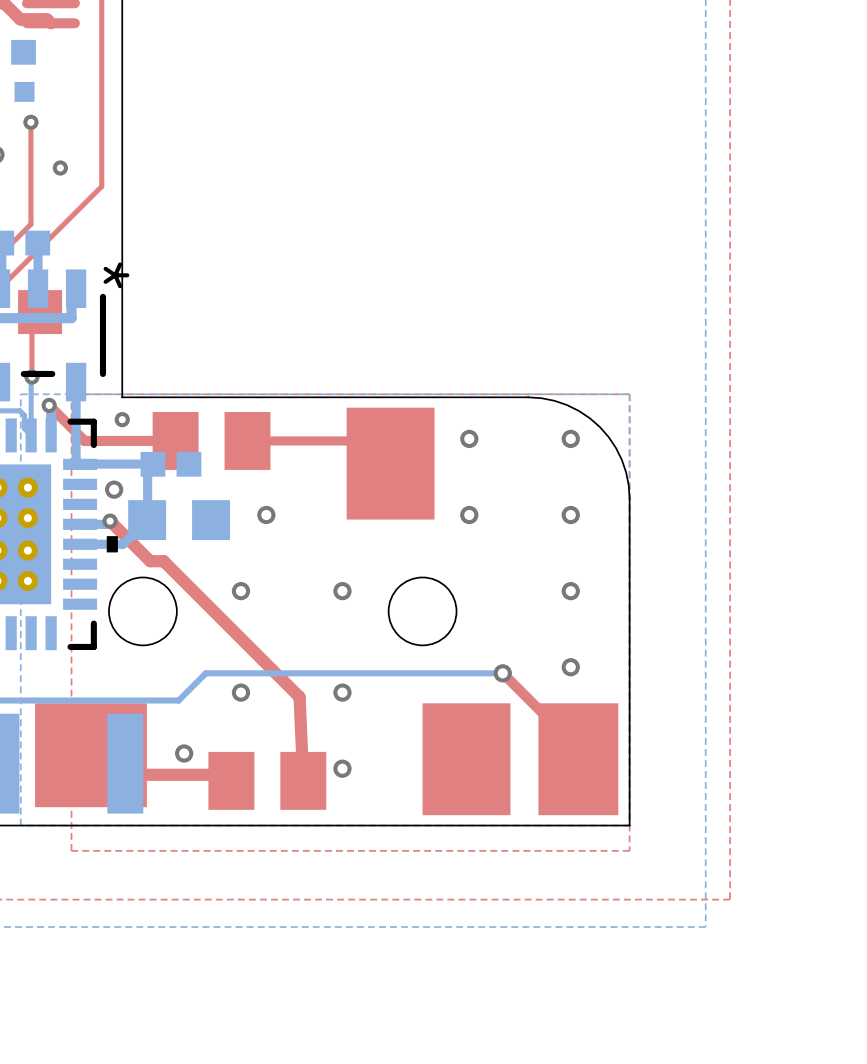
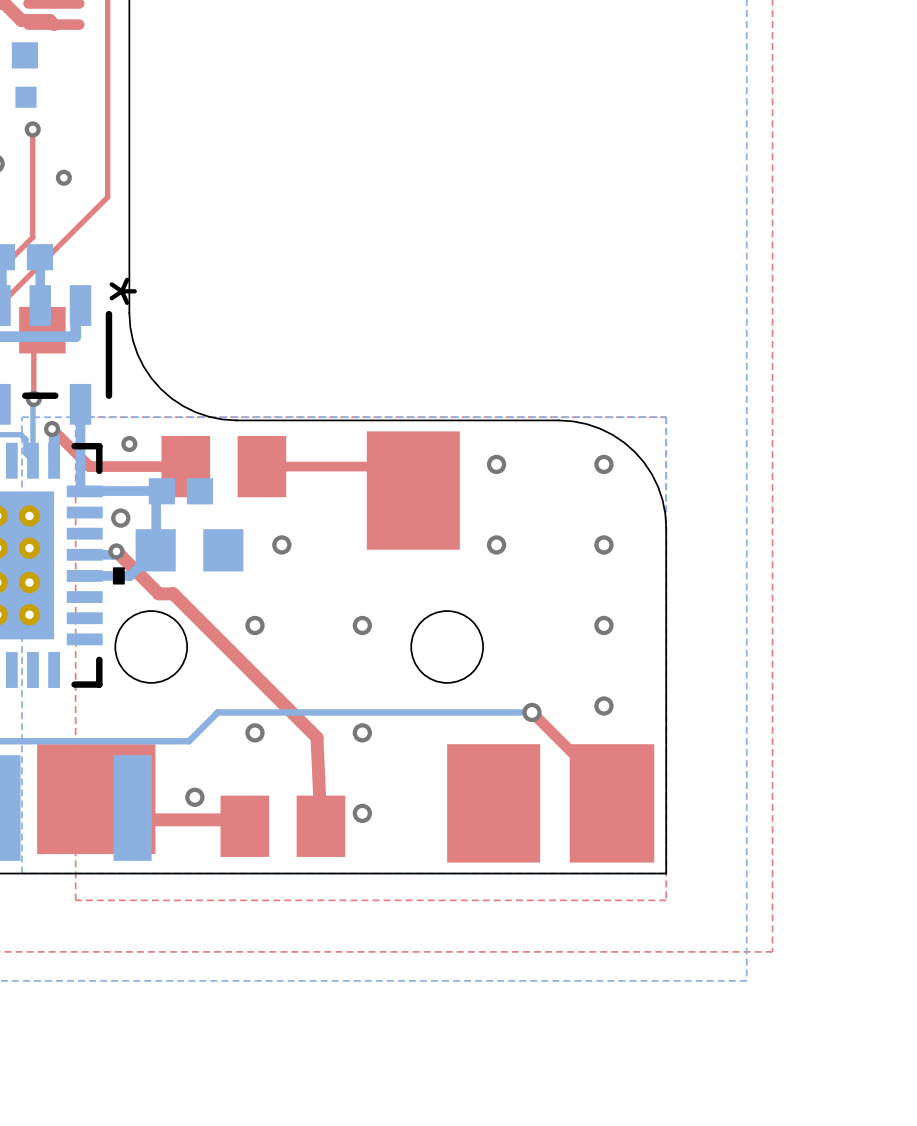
board edge: (122, 295) (122, 397) (223, 397) -> (129, 313) (133, 340) (137, 354) (151, 378) (160, 388) (171, 398) (195, 412) (208, 416) (236, 420)

